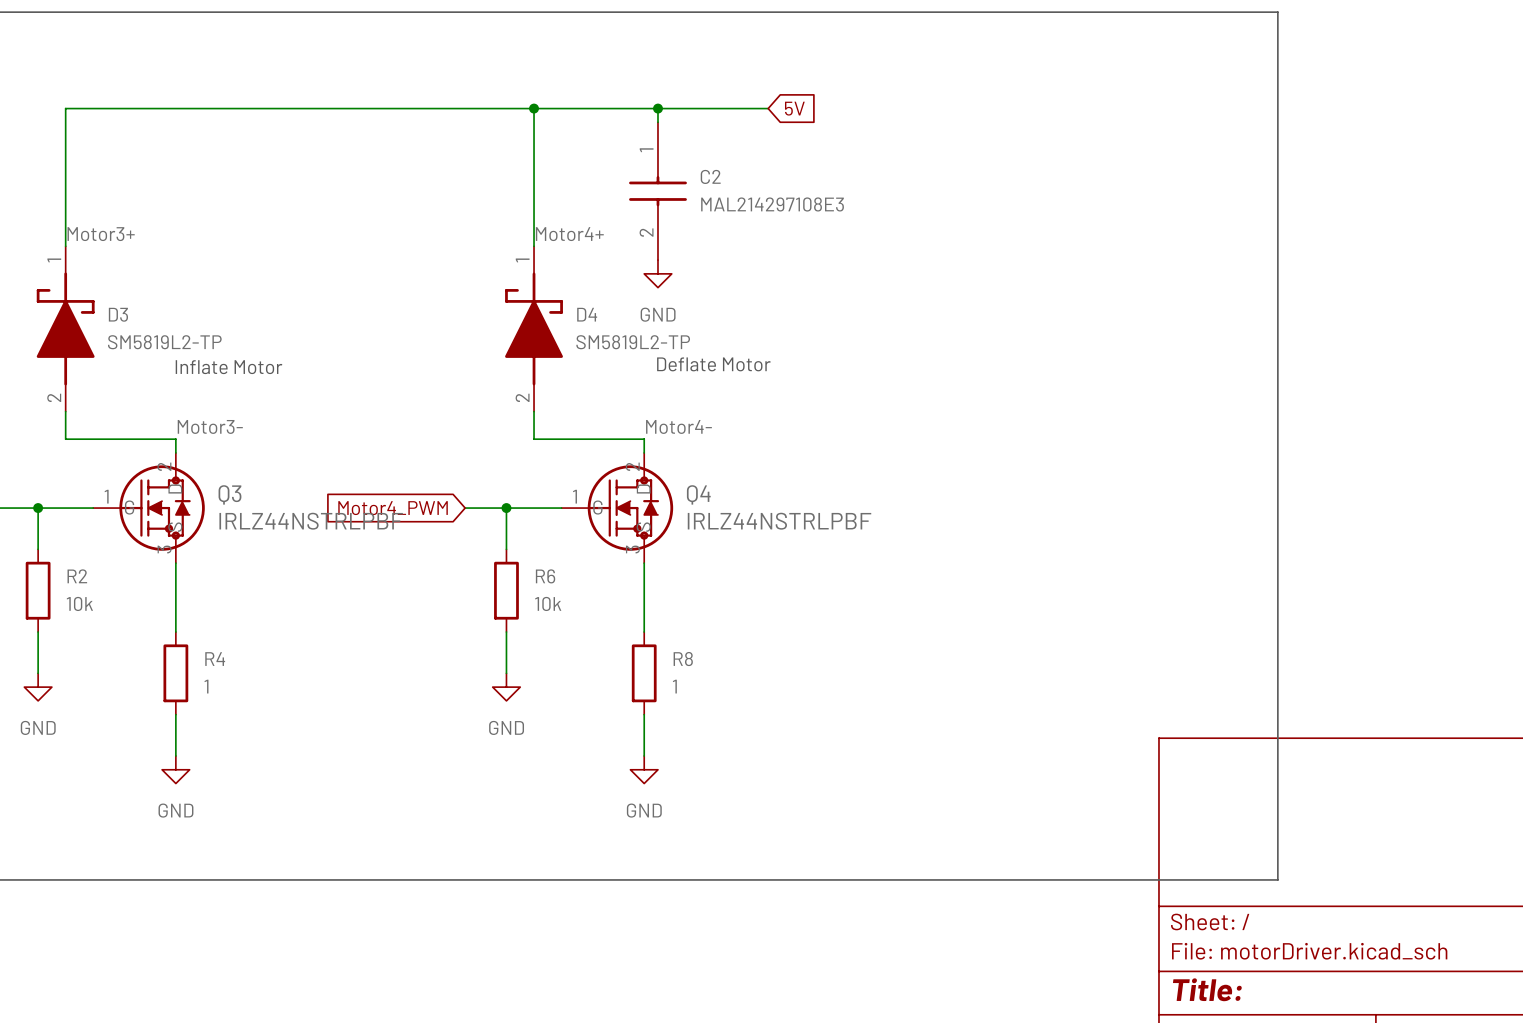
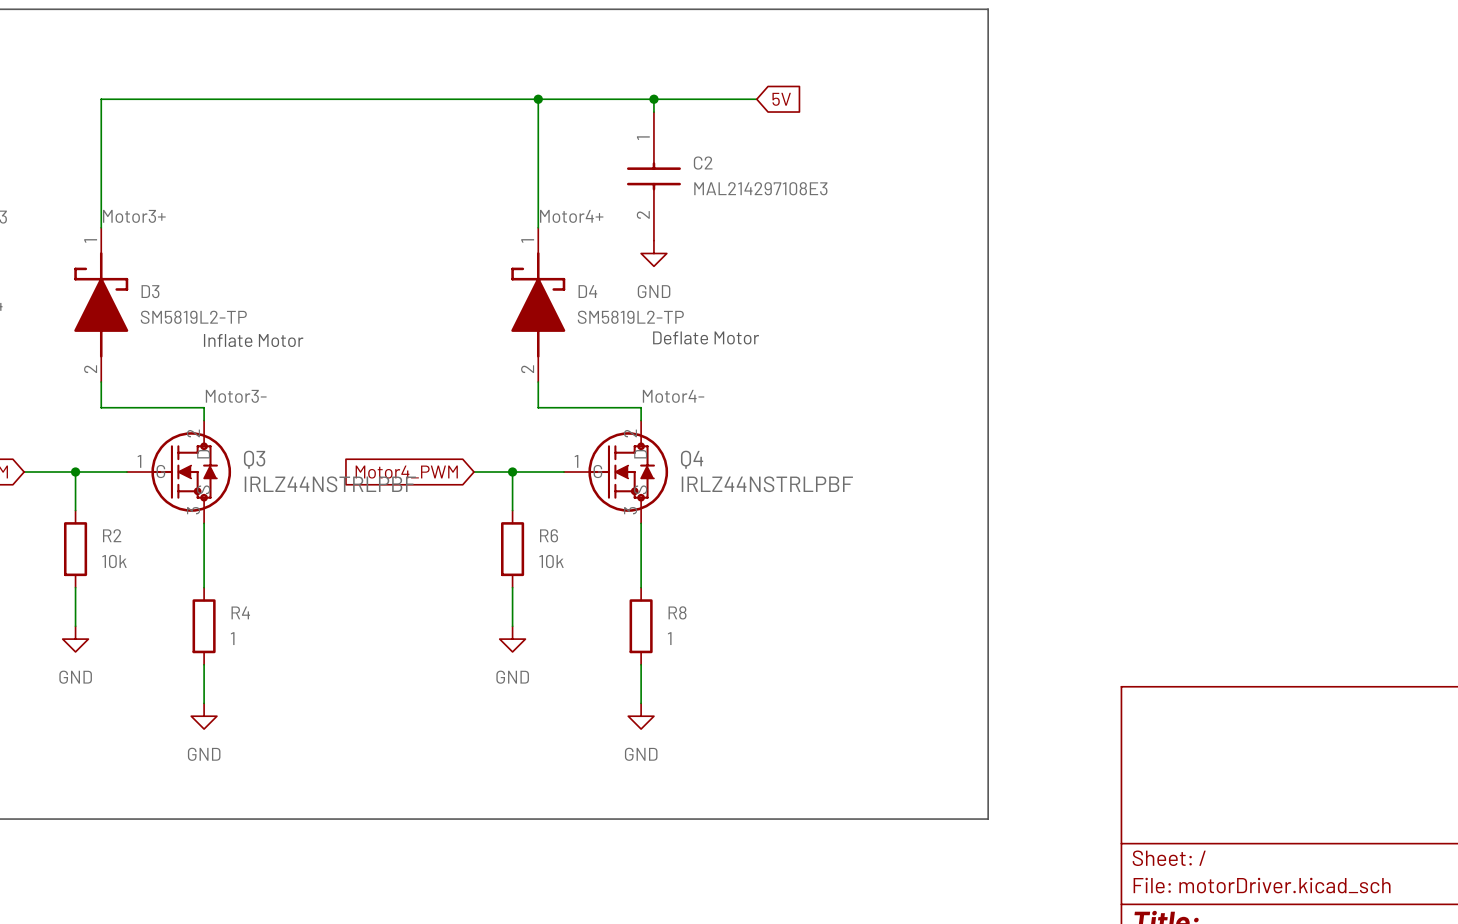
line: (1016, 12) (1277, 12) (1277, 879) (1016, 879) -> (988, 9) (988, 819)

